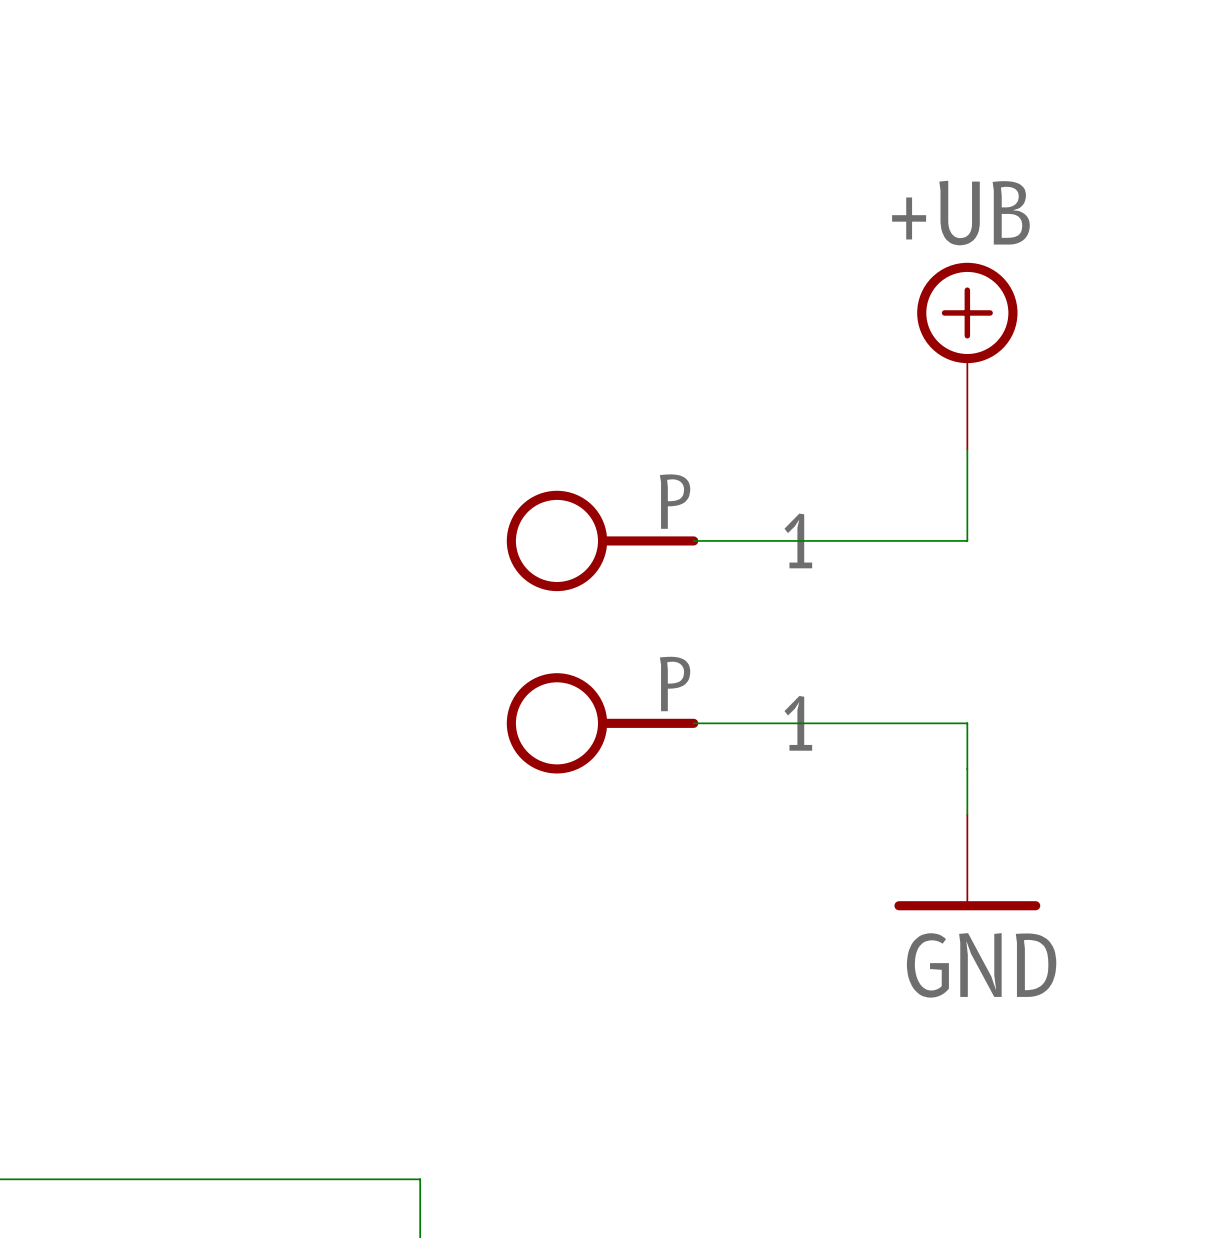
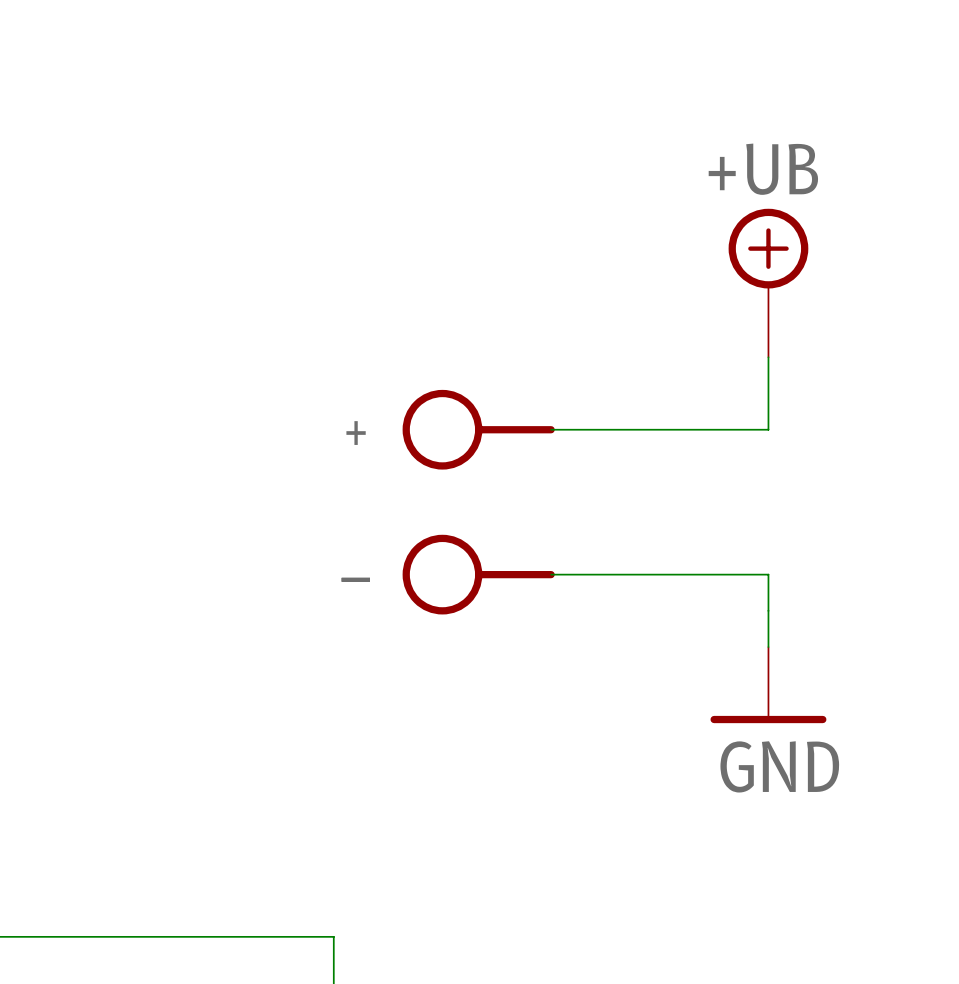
part pin number: P (675, 501) -> none
part pin name: 1 (798, 540) -> none
part name: none -> + (356, 433)
part pin number: P (675, 684) -> none
part pin name: 1 (798, 723) -> none
part name: none -> ̶̶ (355, 579)

